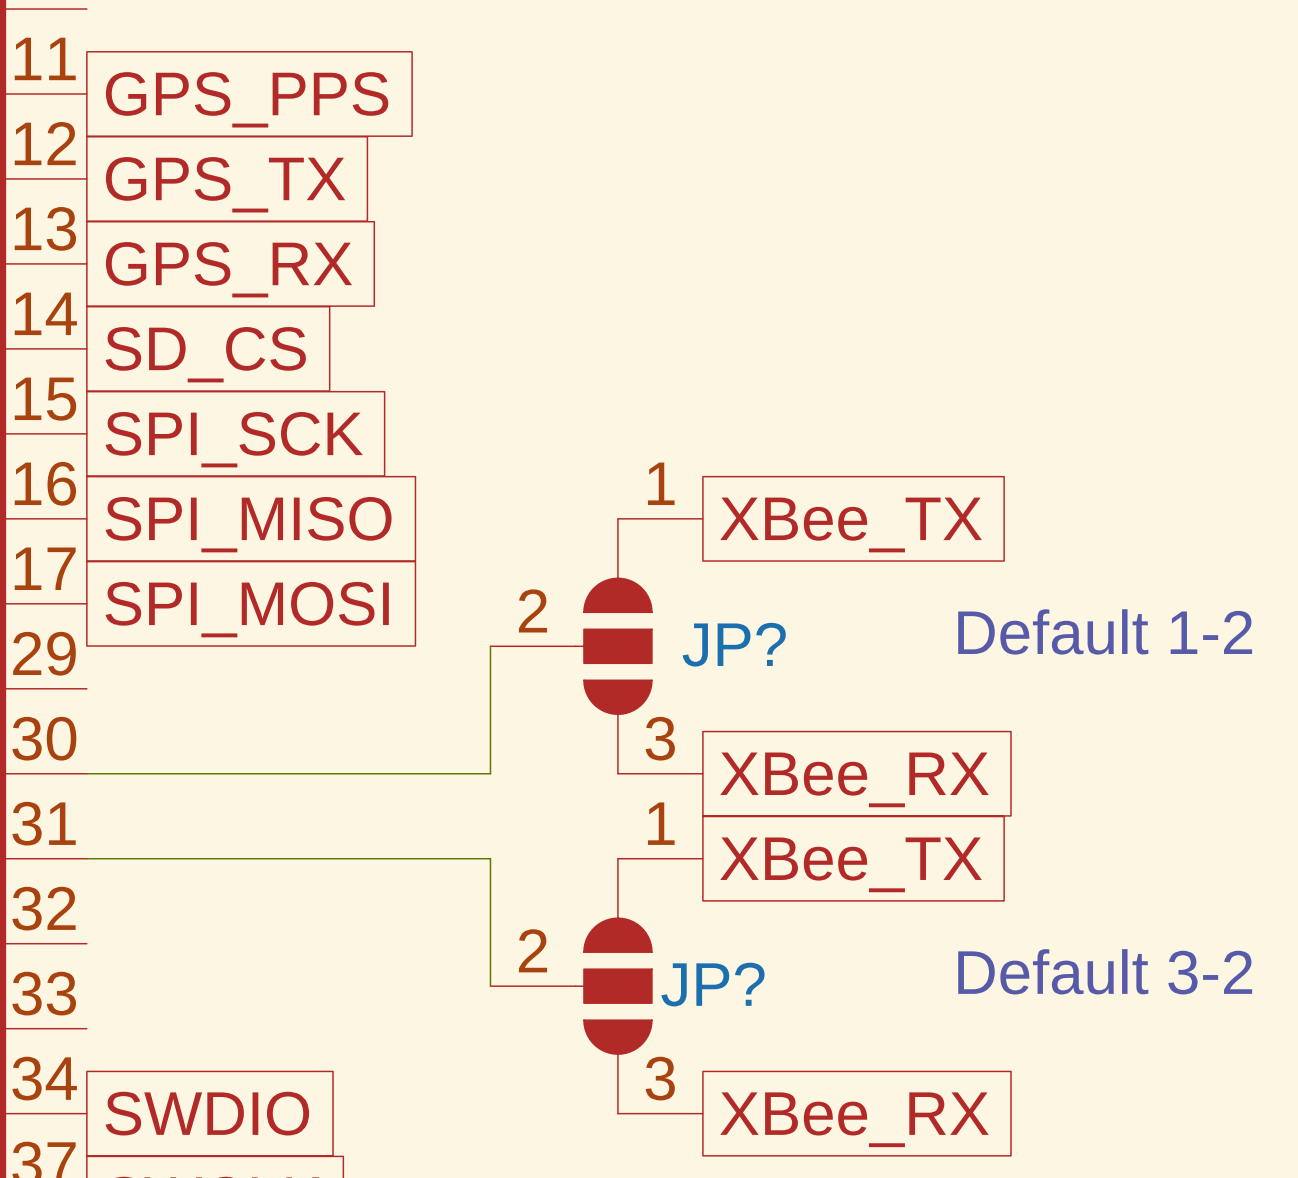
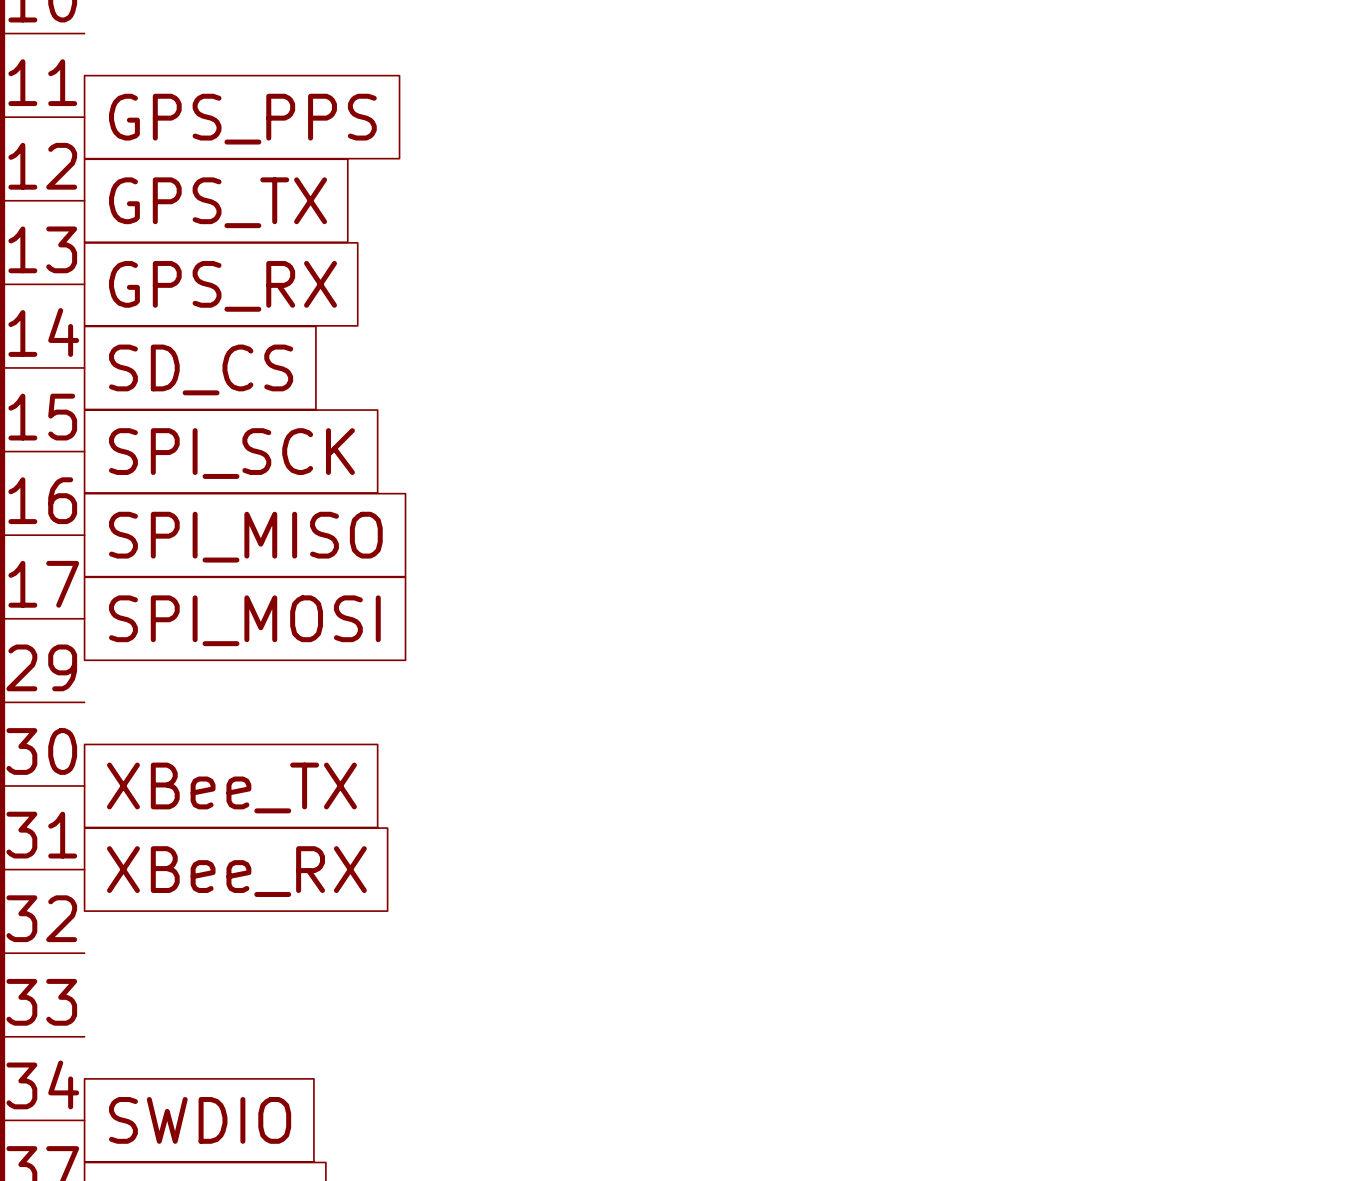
global label: XBee_TX (851, 524) -> none
text: Default 1-2 (1105, 631) -> none
wire: (490, 646) (490, 773) (86, 773) -> none
JP?: (596, 646) -> none
global label: none -> XBee_TX (231, 787)
global label: XBee_RX (854, 779) -> none
wire: (86, 858) (490, 858) (490, 986) -> none
global label: none -> XBee_RX (236, 871)
global label: XBee_TX (851, 864) -> none
text: Default 3-2 (1105, 971) -> none
JP?: (596, 986) -> none
global label: XBee_RX (854, 1119) -> none

